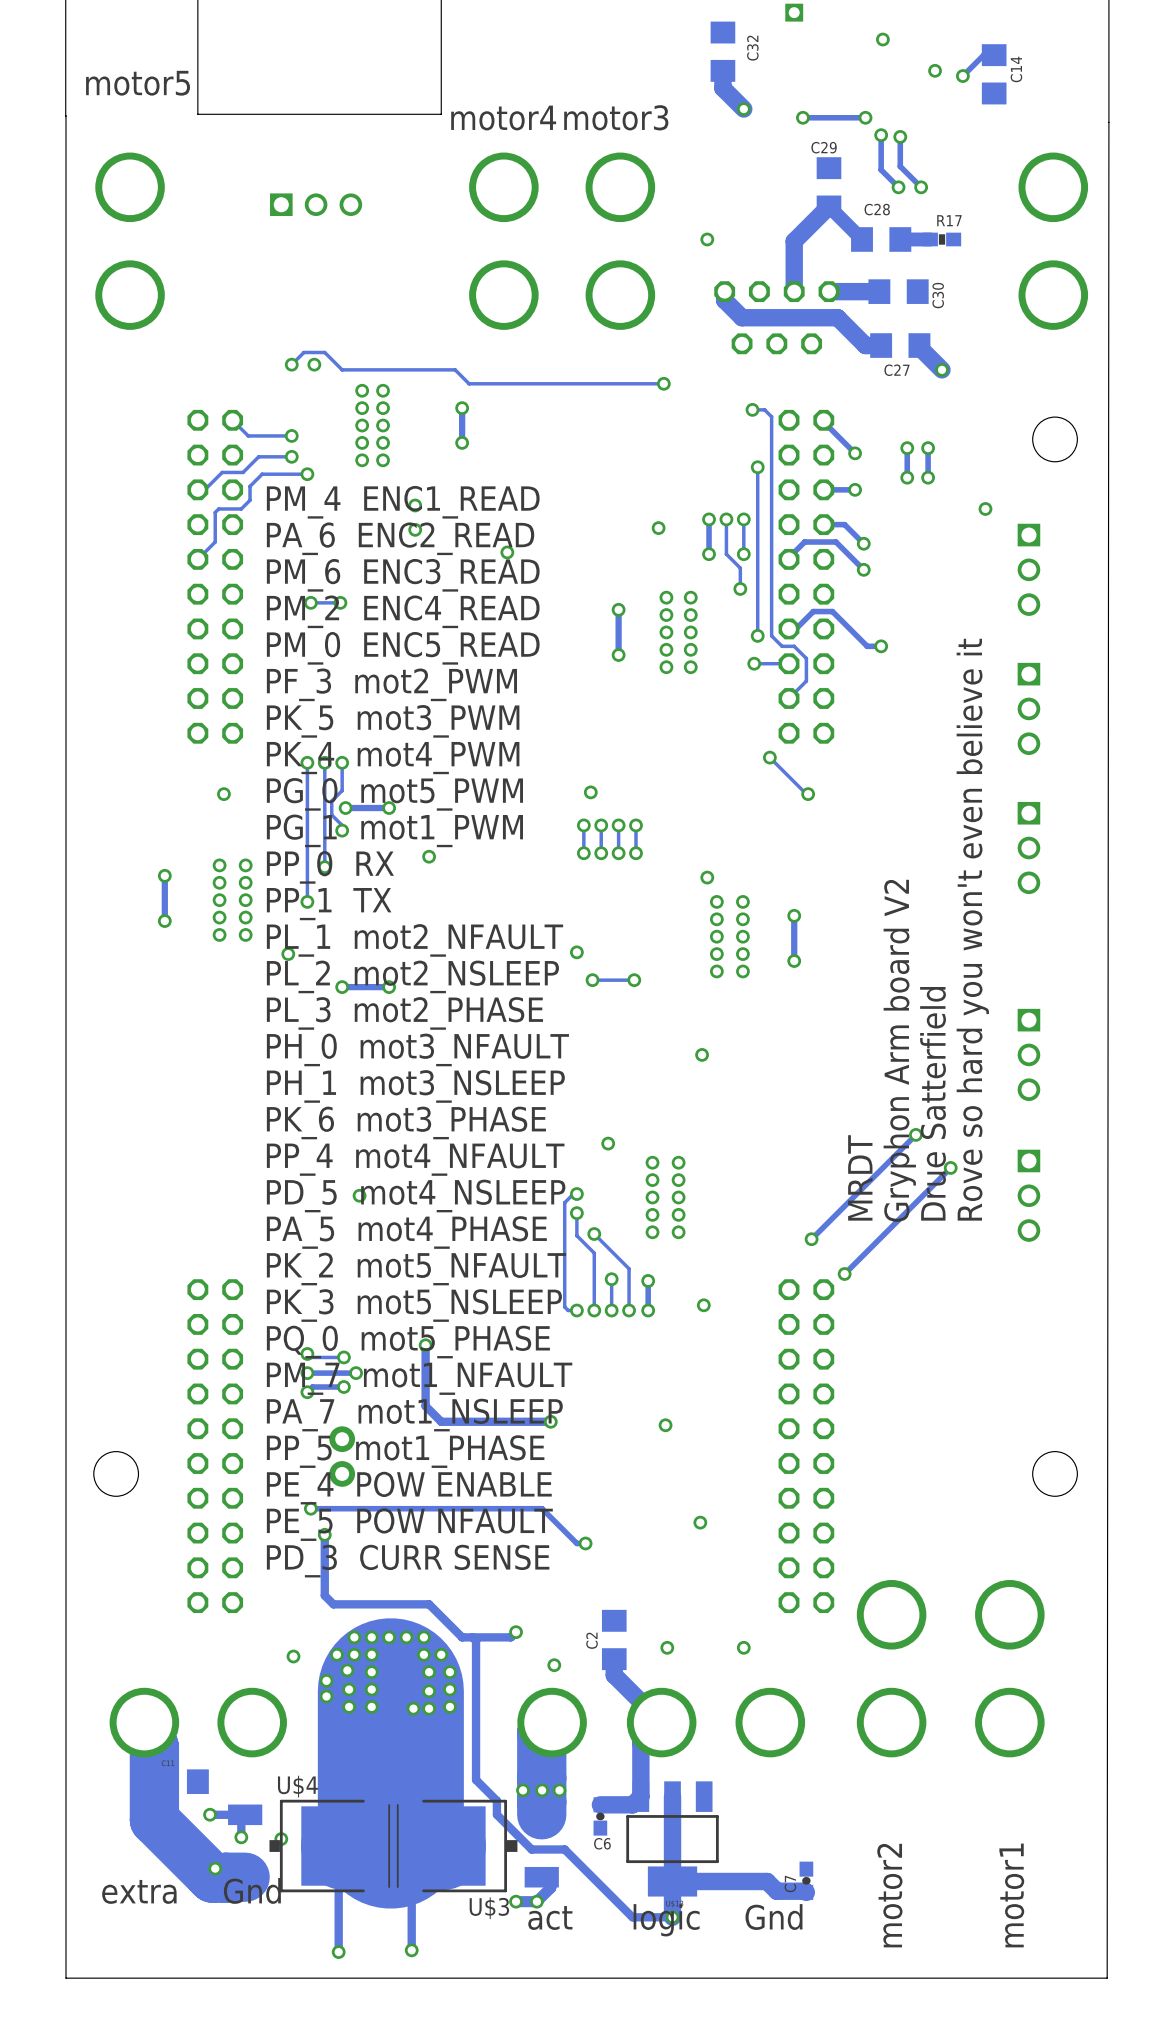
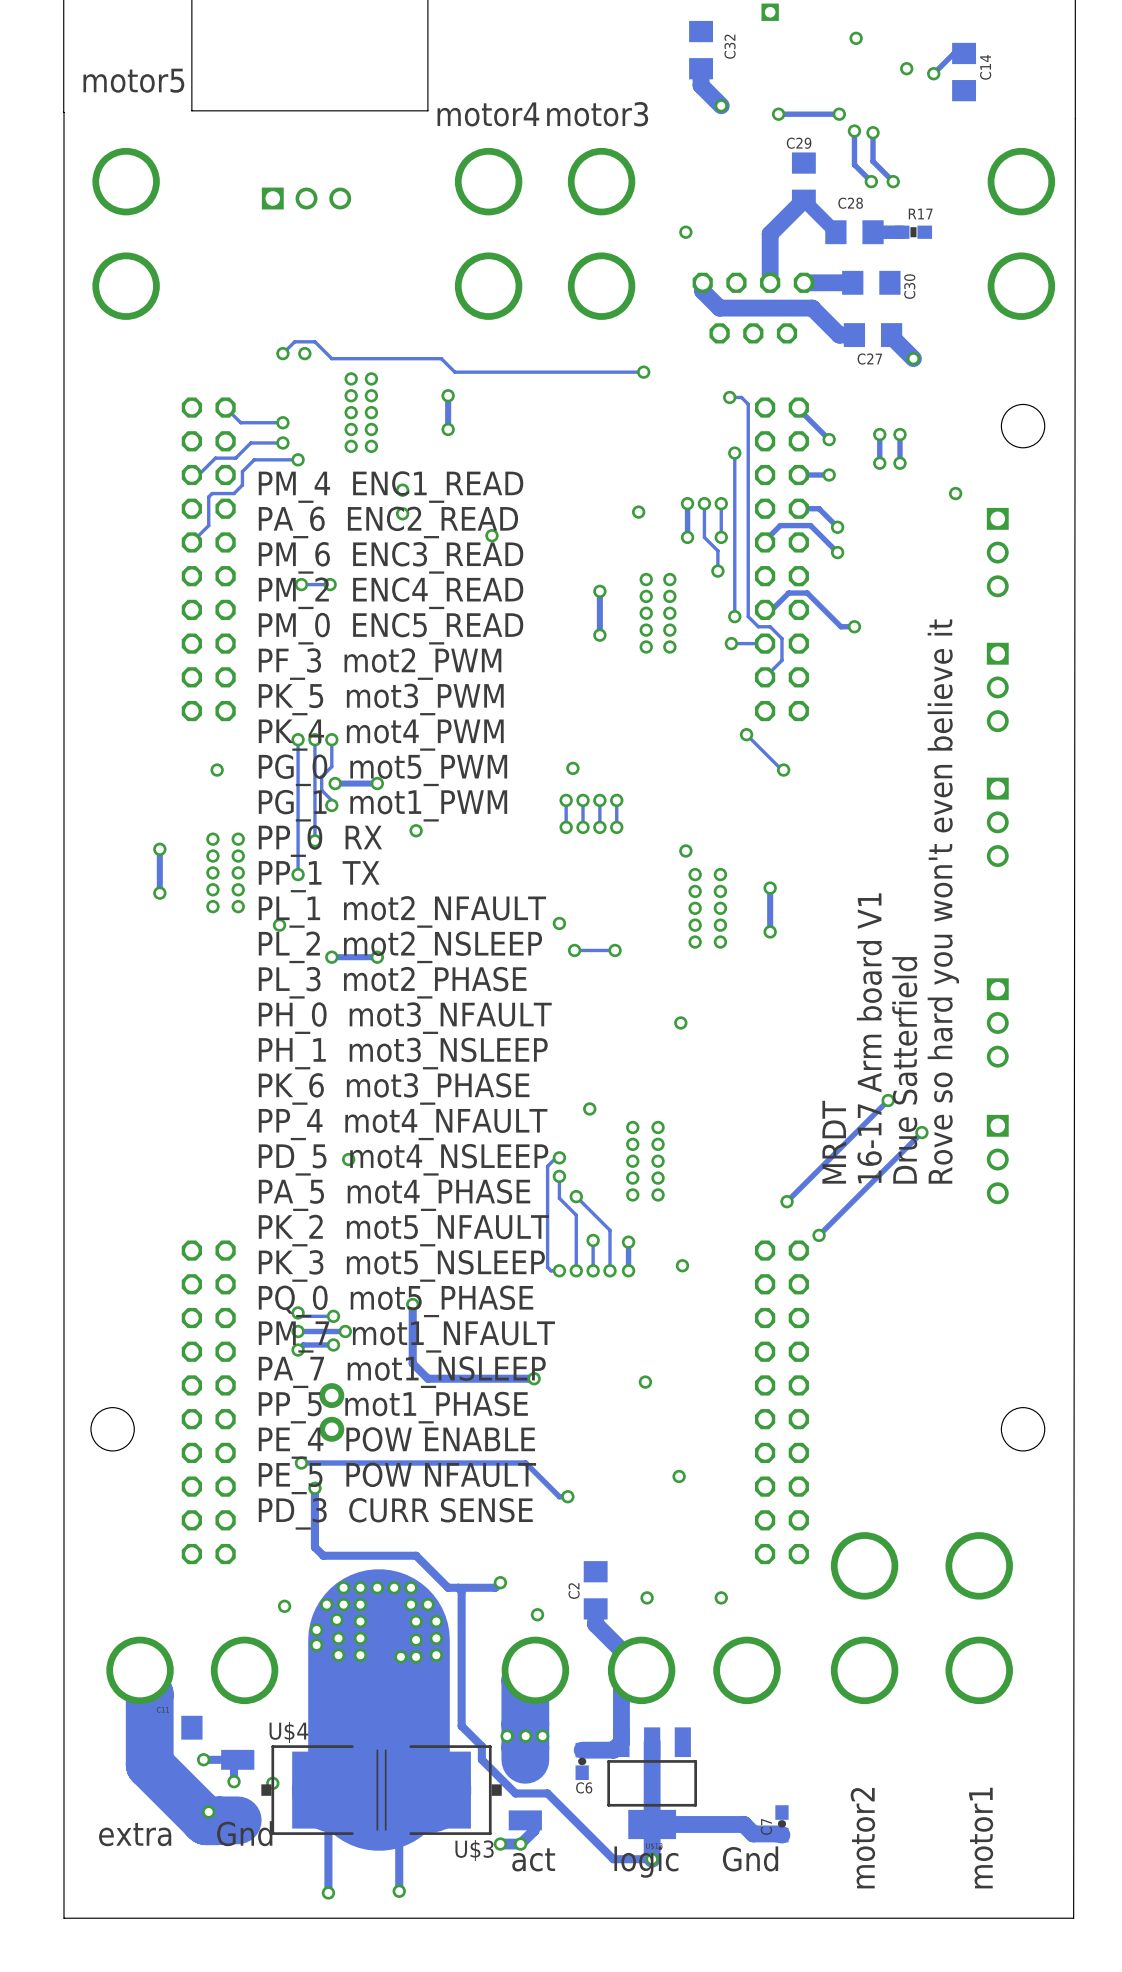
text: Gryphon Arm board V2 (899, 1050) -> 16-17 Arm board V1 (869, 1038)

